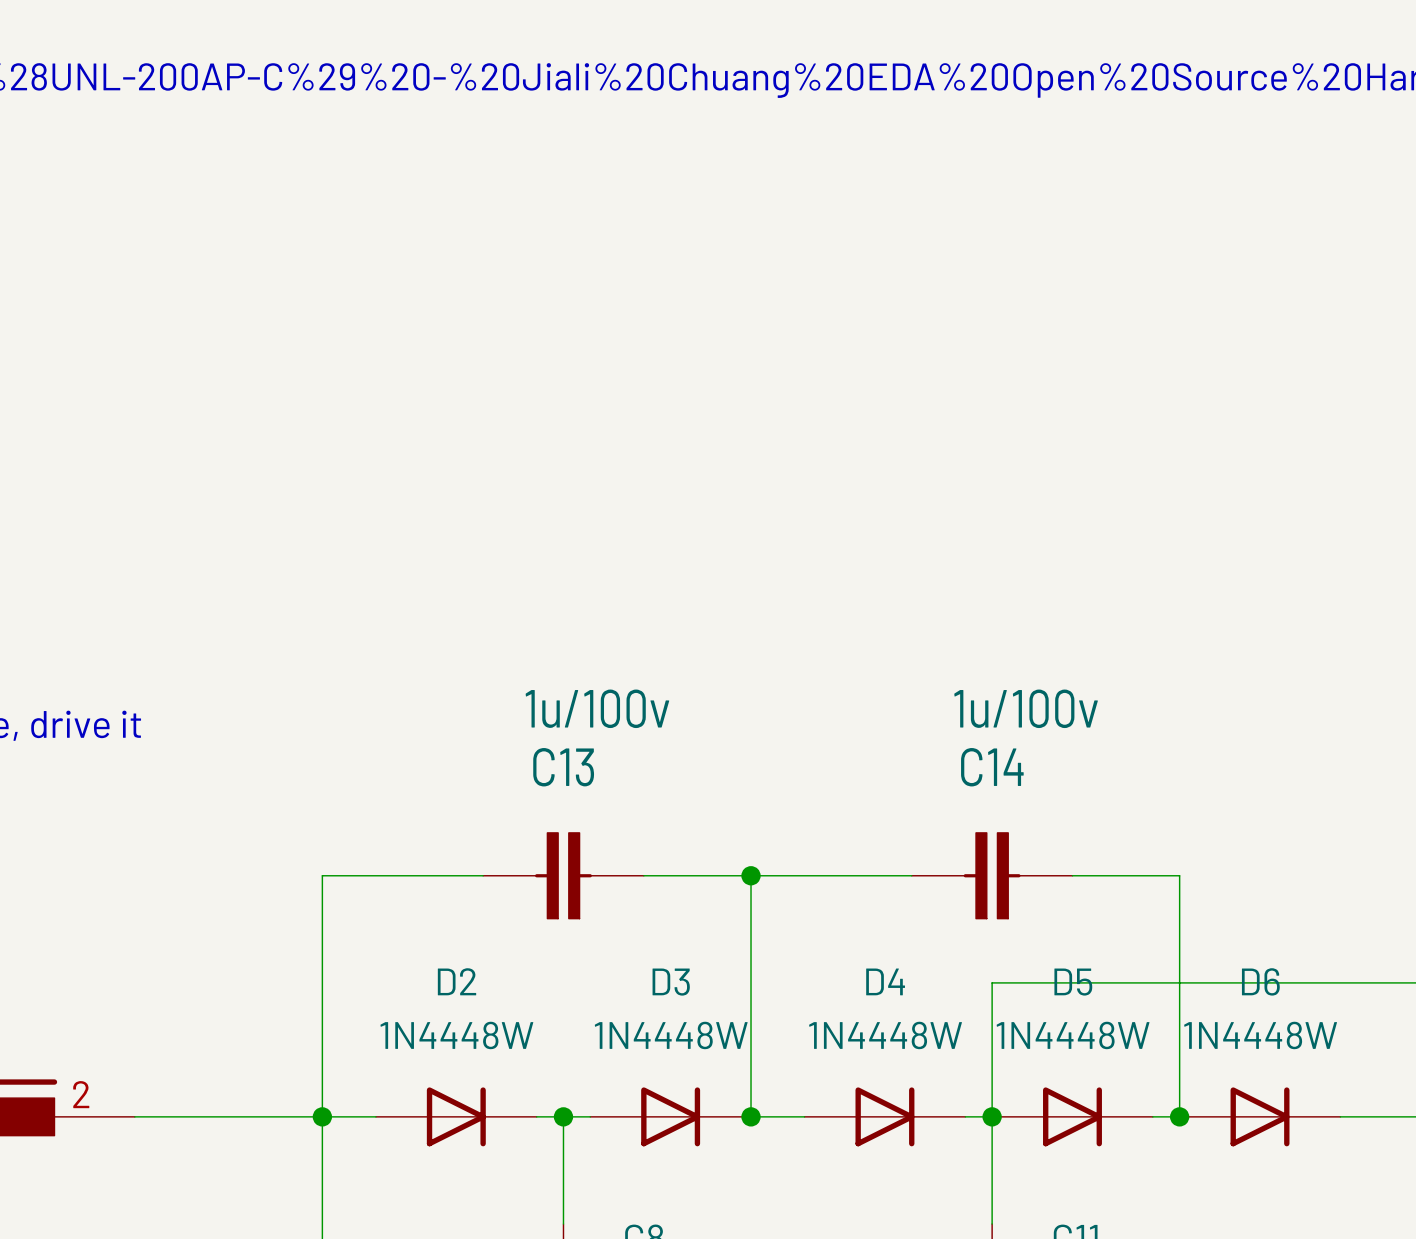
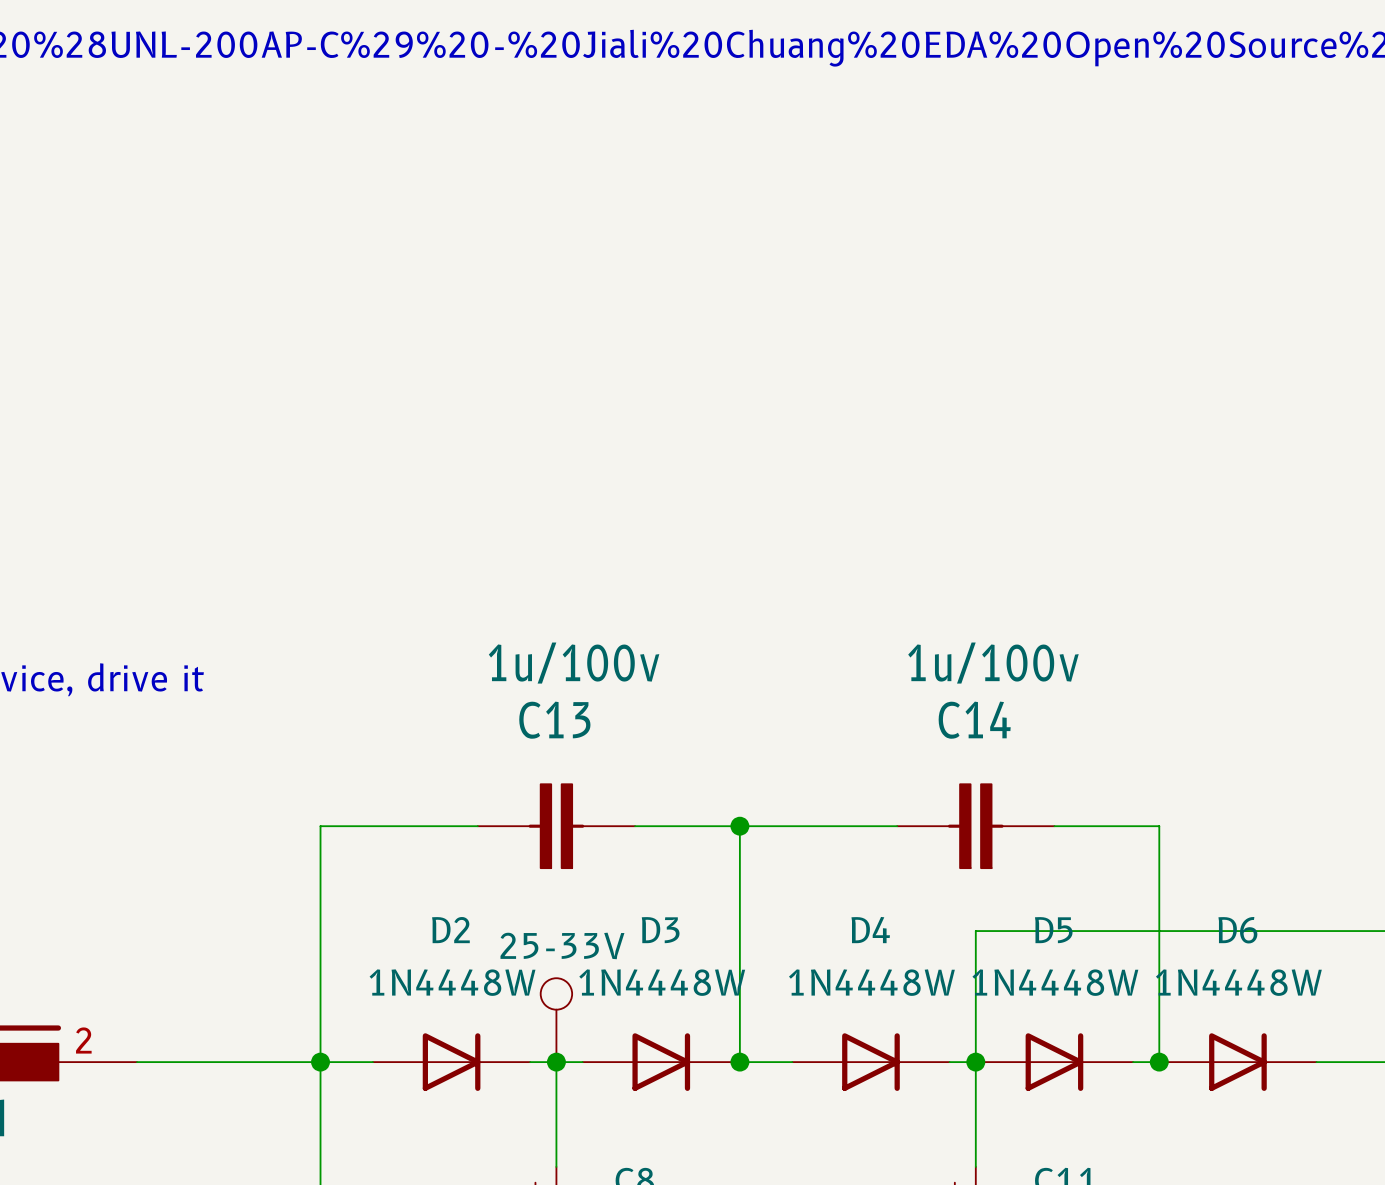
part: none -> 25-33V (556, 1020)

